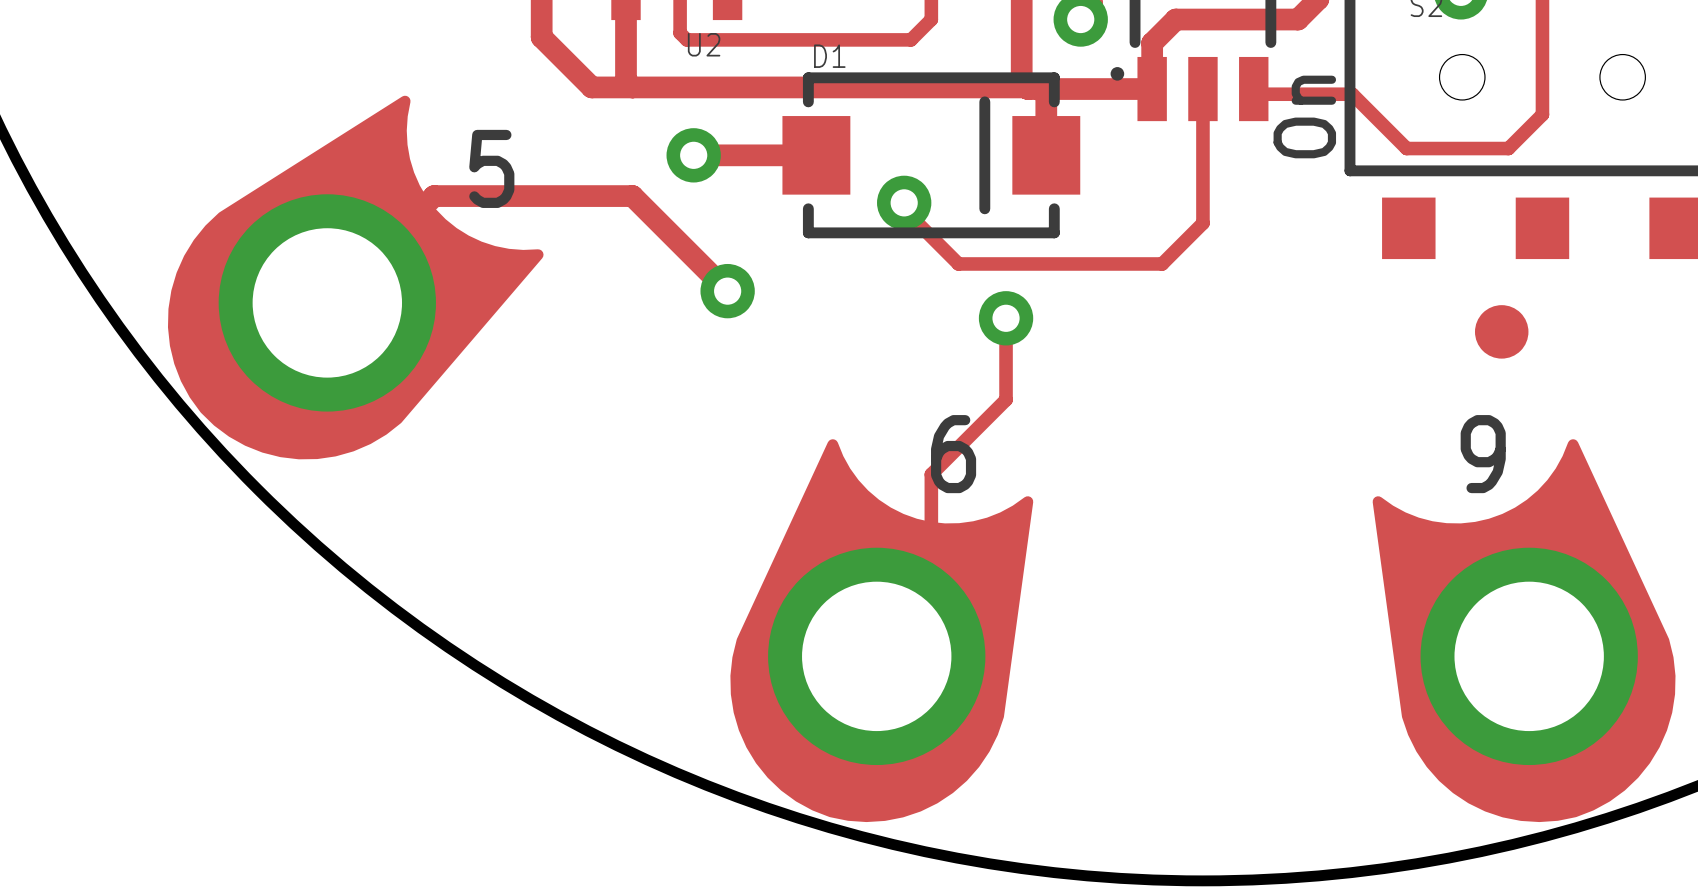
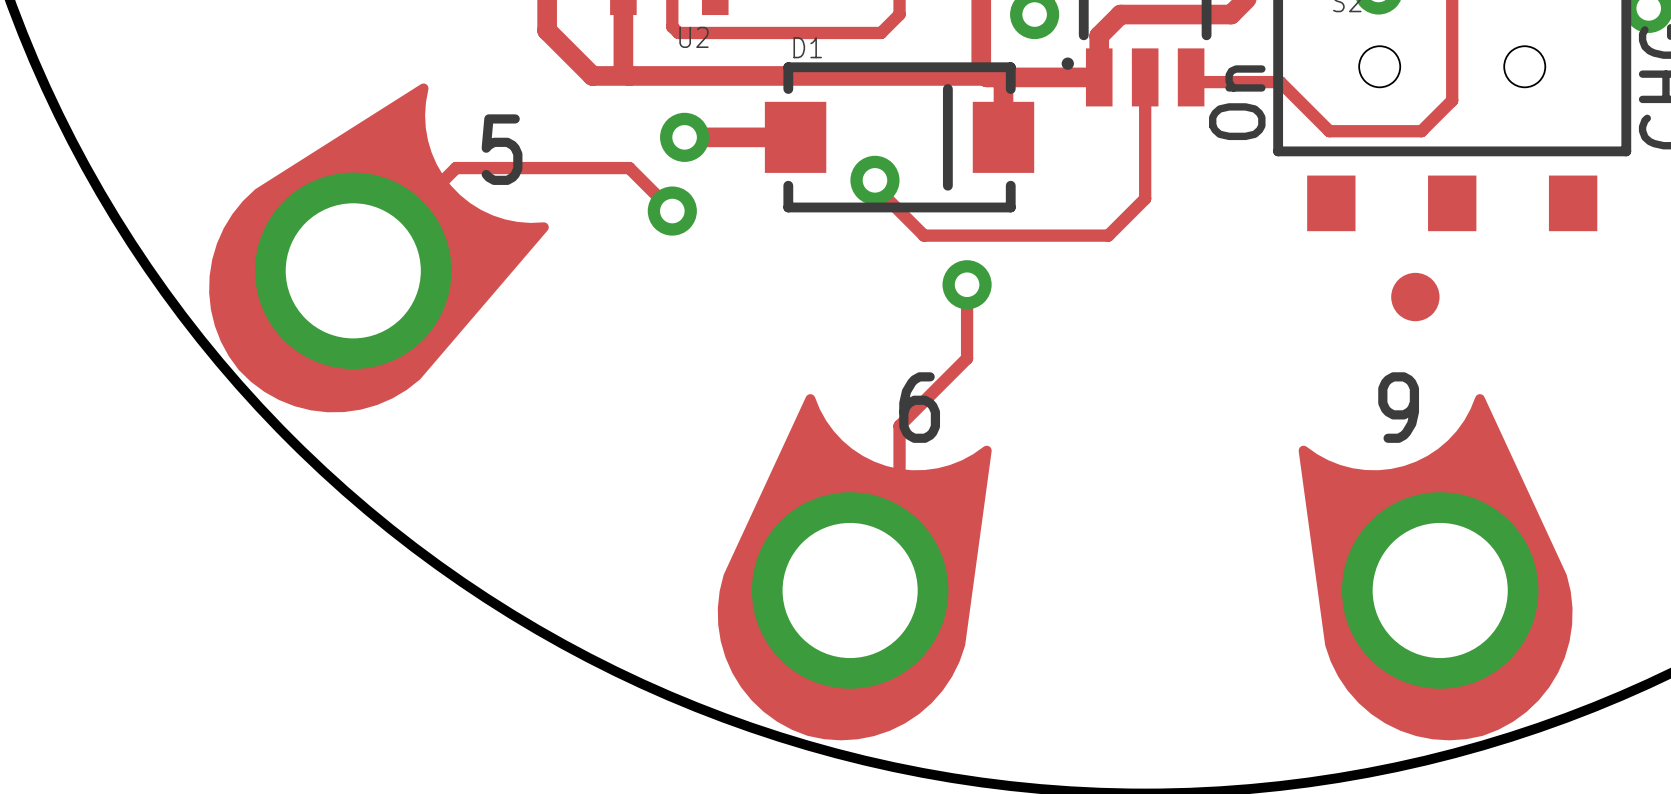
track: (434, 196) (632, 196) (727, 291) -> (449, 174) (456, 168) (629, 168) (672, 211)
via position: (727, 291) -> (672, 211)

